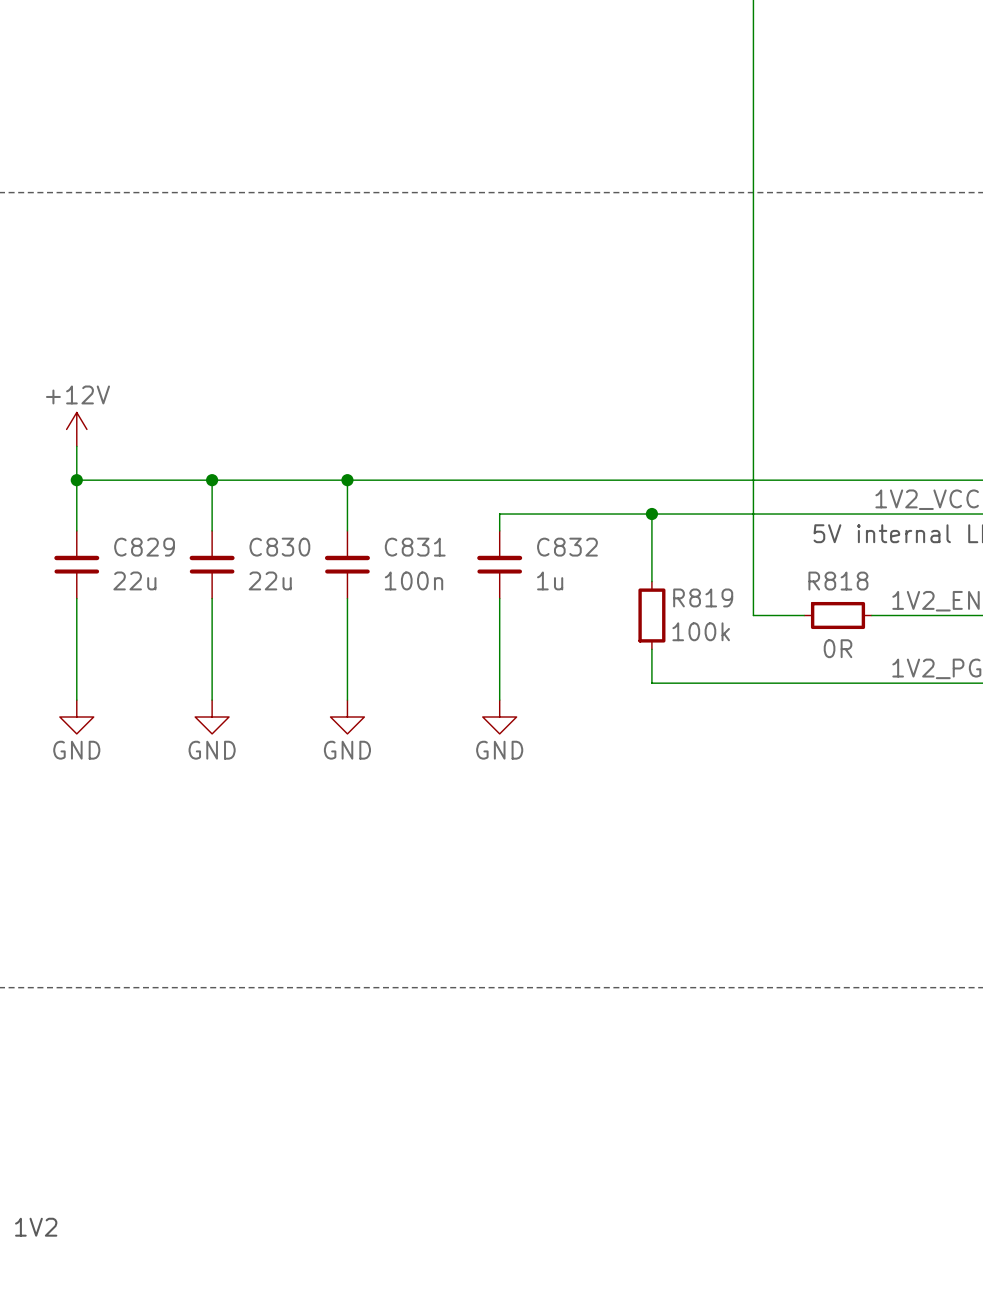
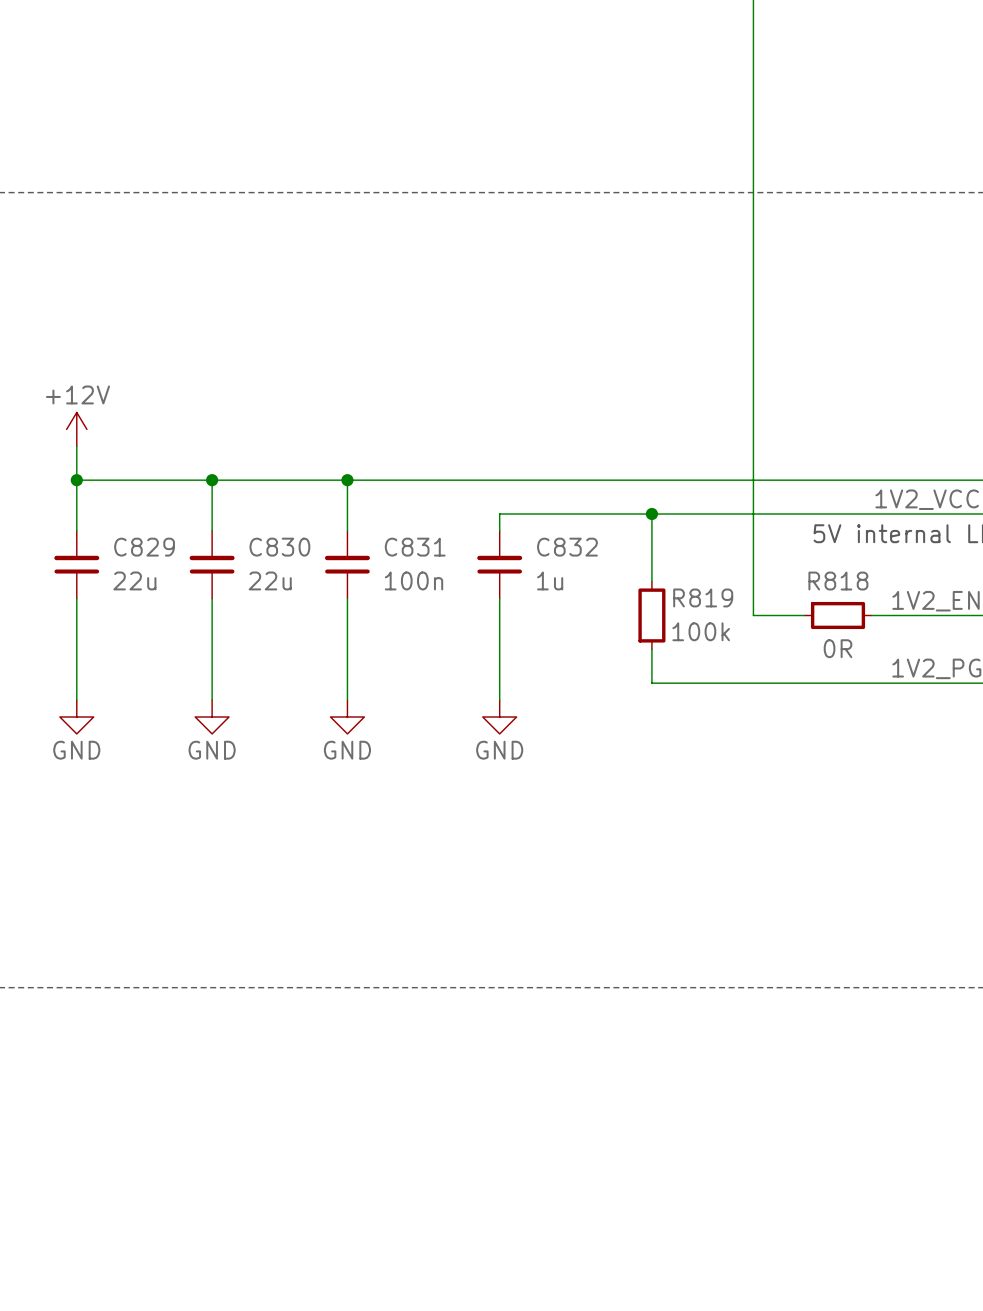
text: 1V2 (36, 1227) -> none

